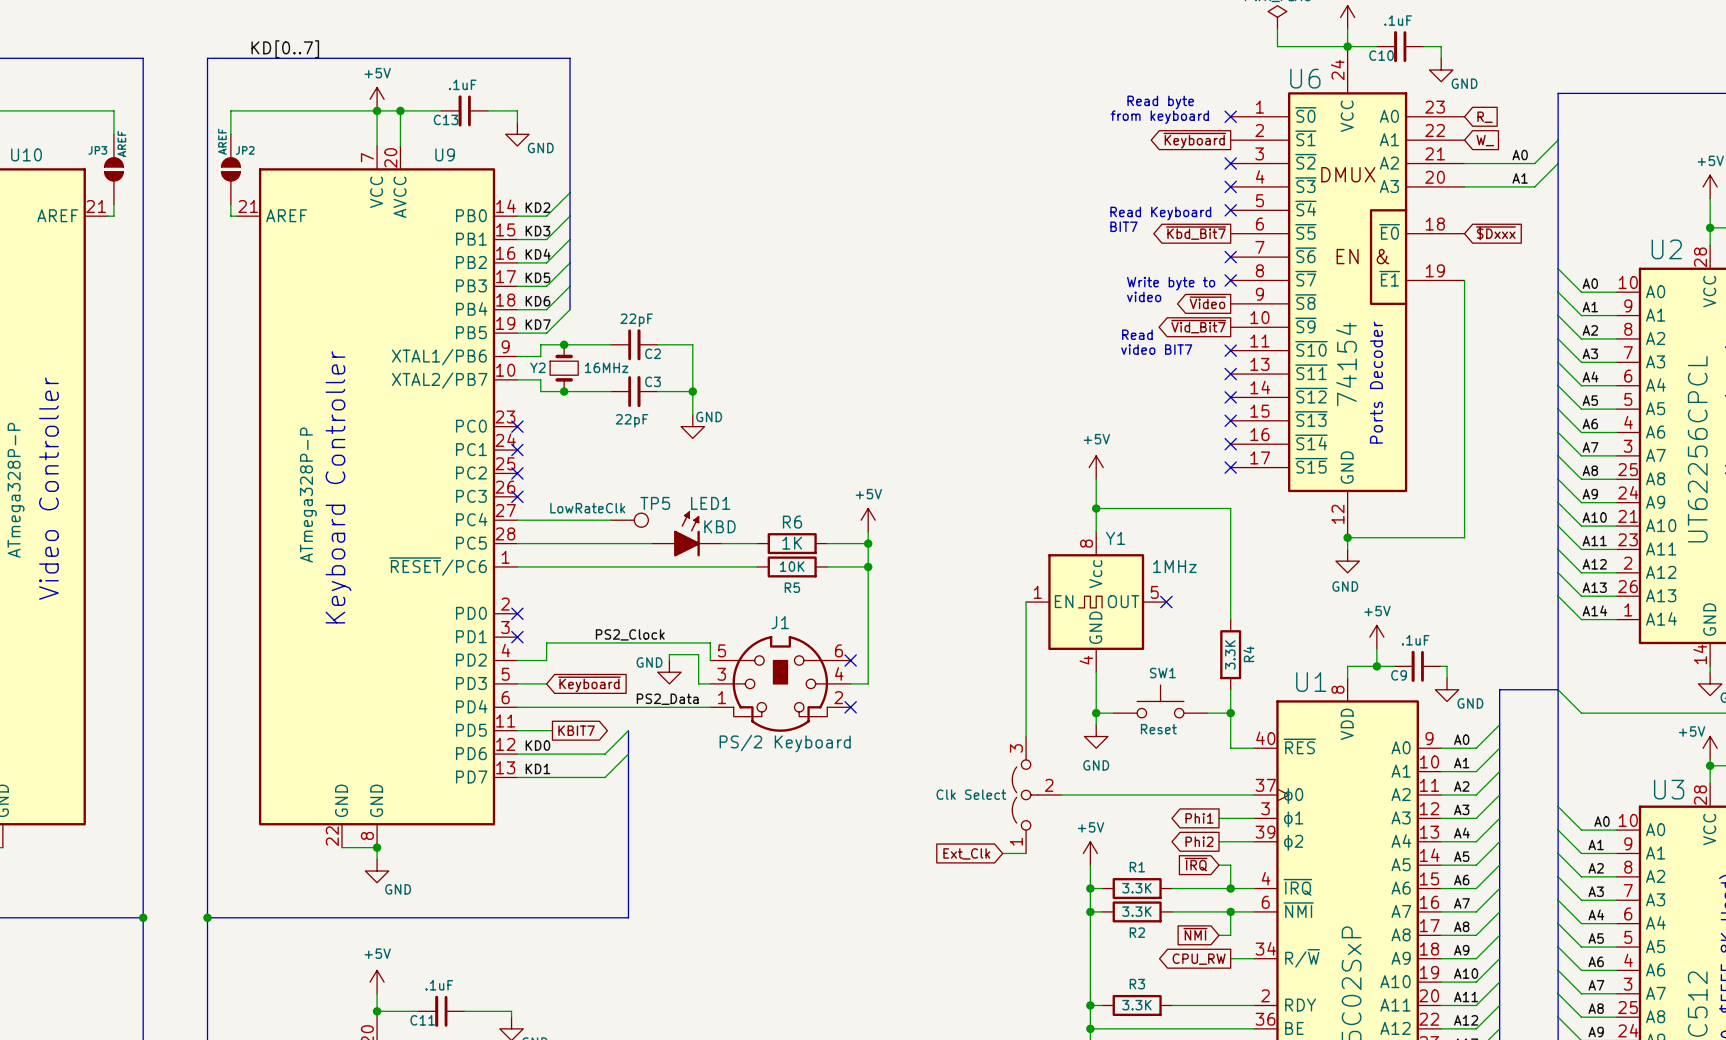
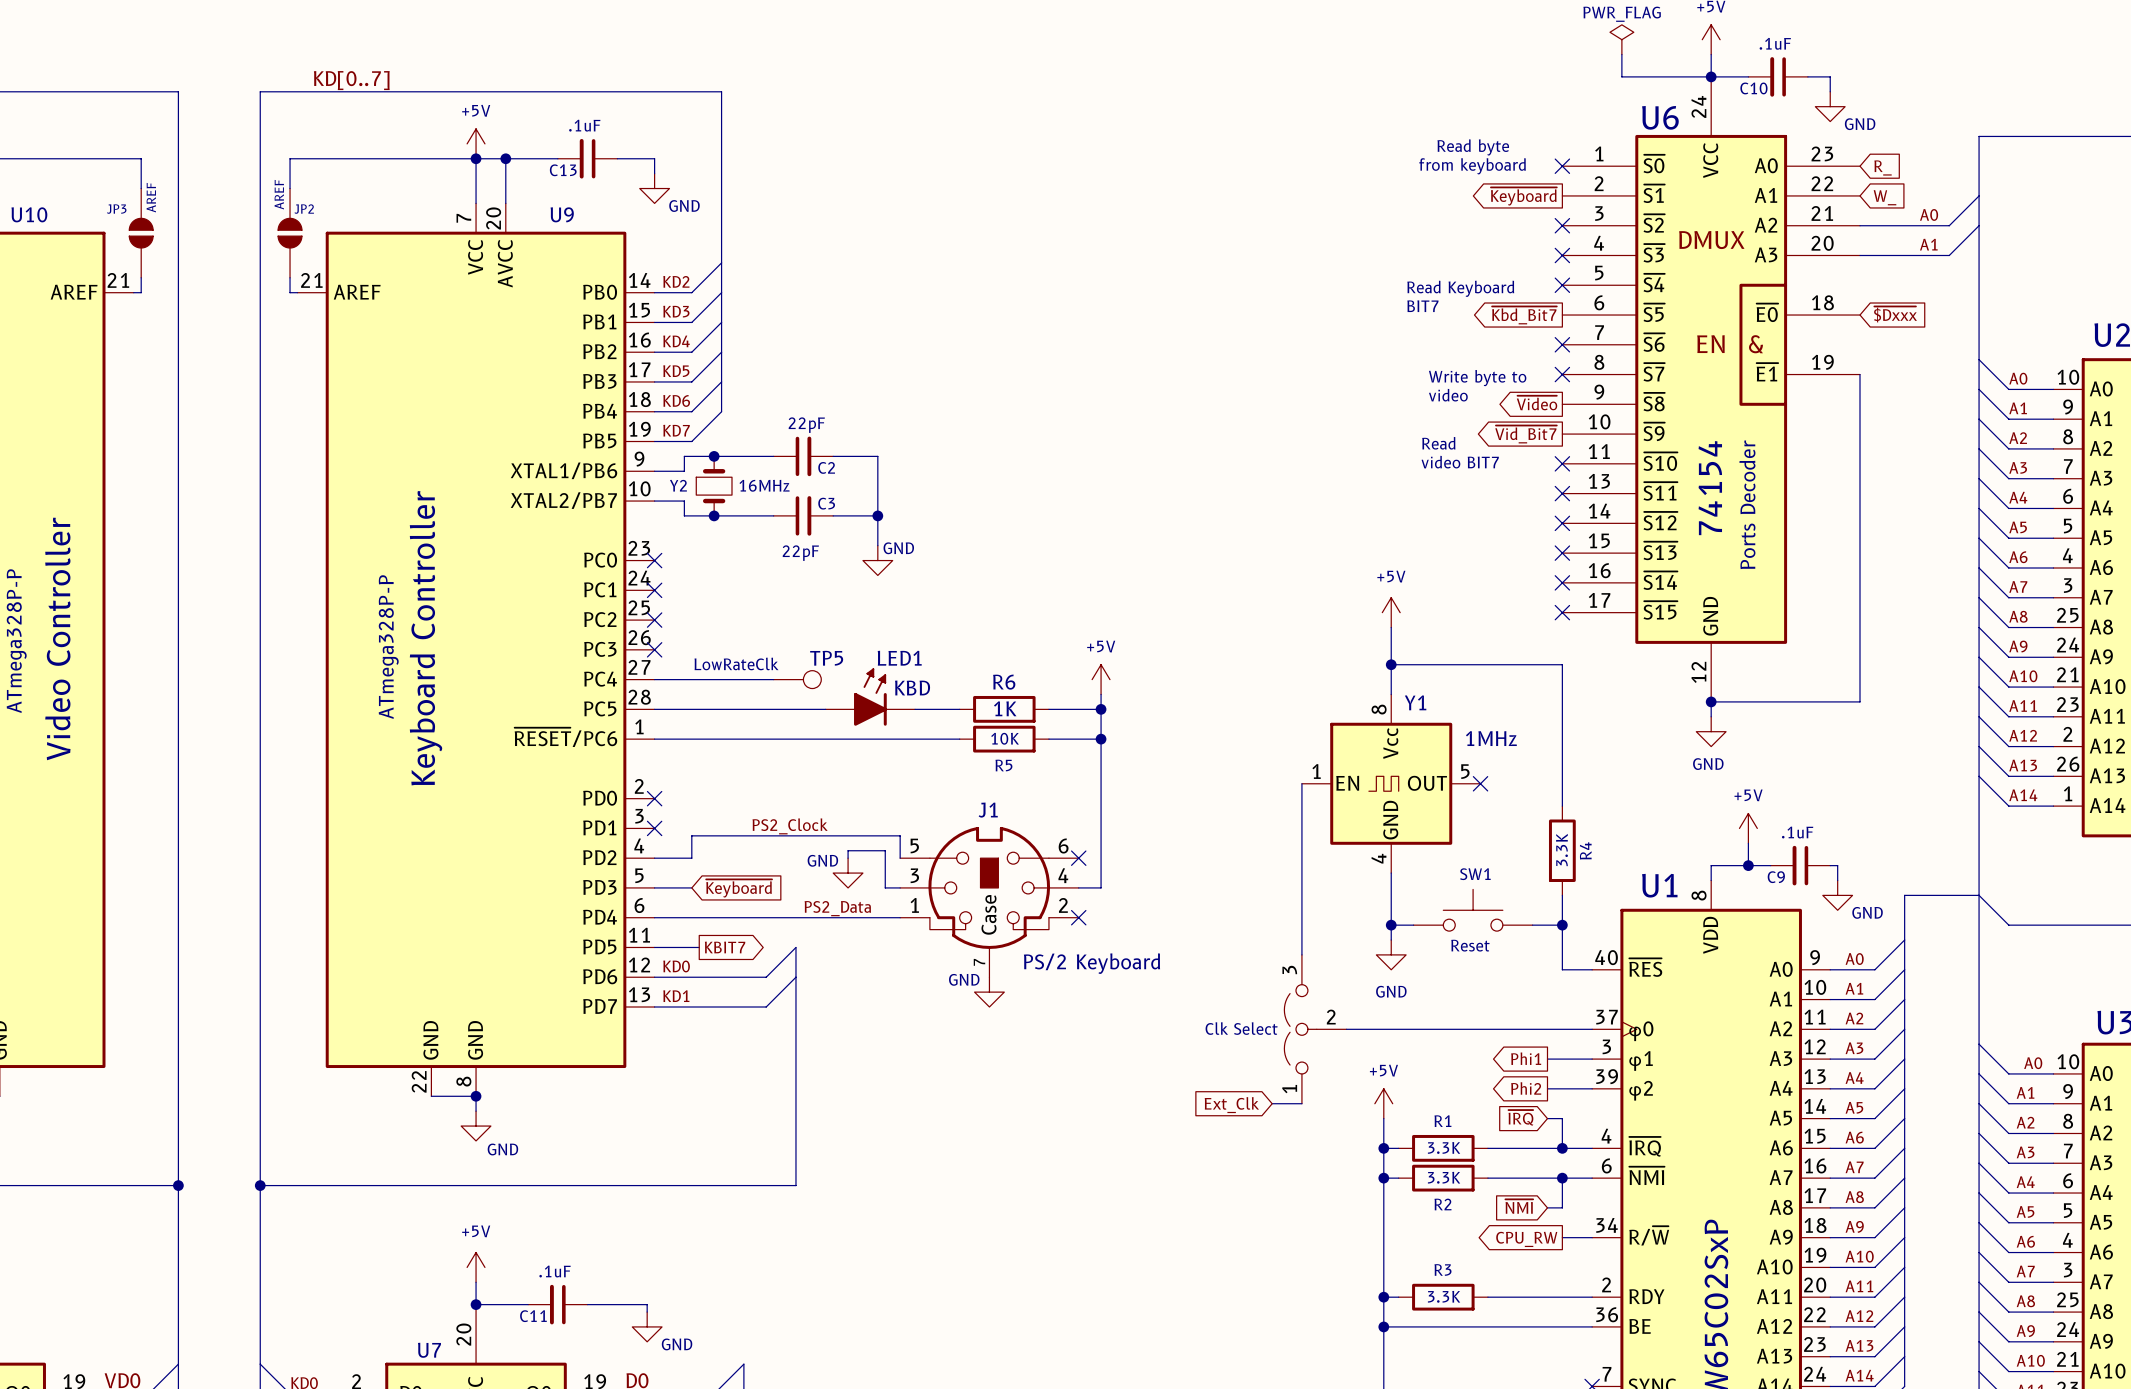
J1 symbol: [710, 635, 851, 732] -> [900, 826, 1079, 978]
J1 value position: PS/2 Keyboard (785, 743) -> PS/2 Keyboard (1092, 963)
power symbol: none -> GND (989, 992)

